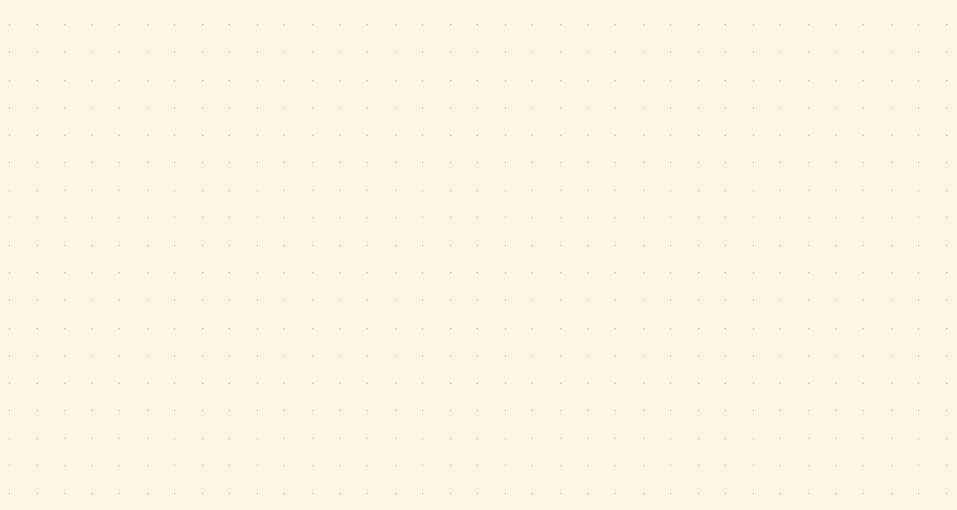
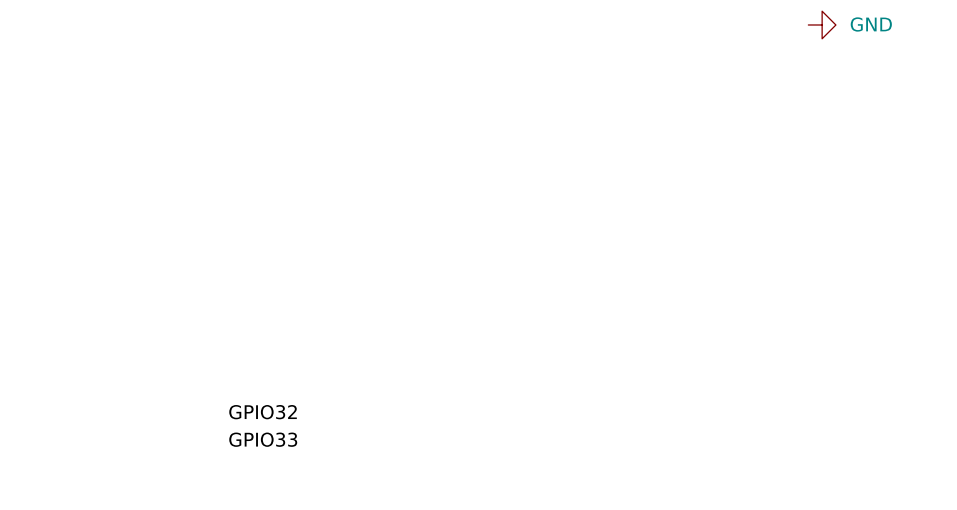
power symbol: none -> GND (822, 24)
label: none -> GPIO32 (263, 412)
label: none -> GPIO33 (263, 439)

